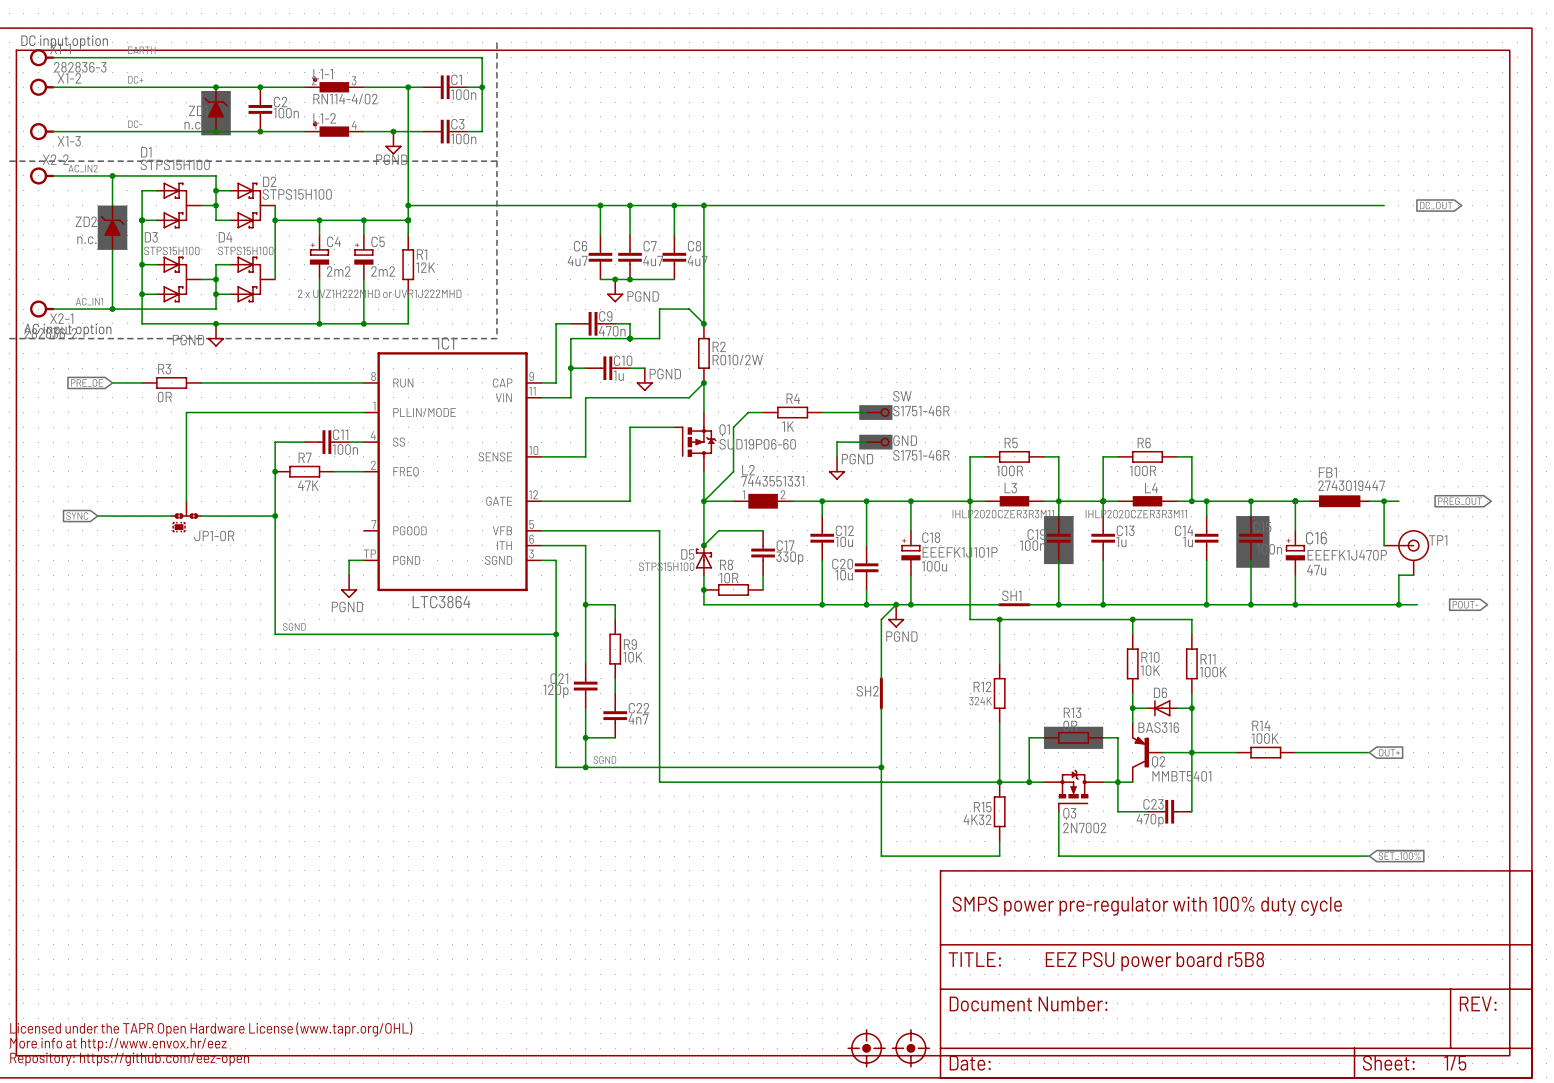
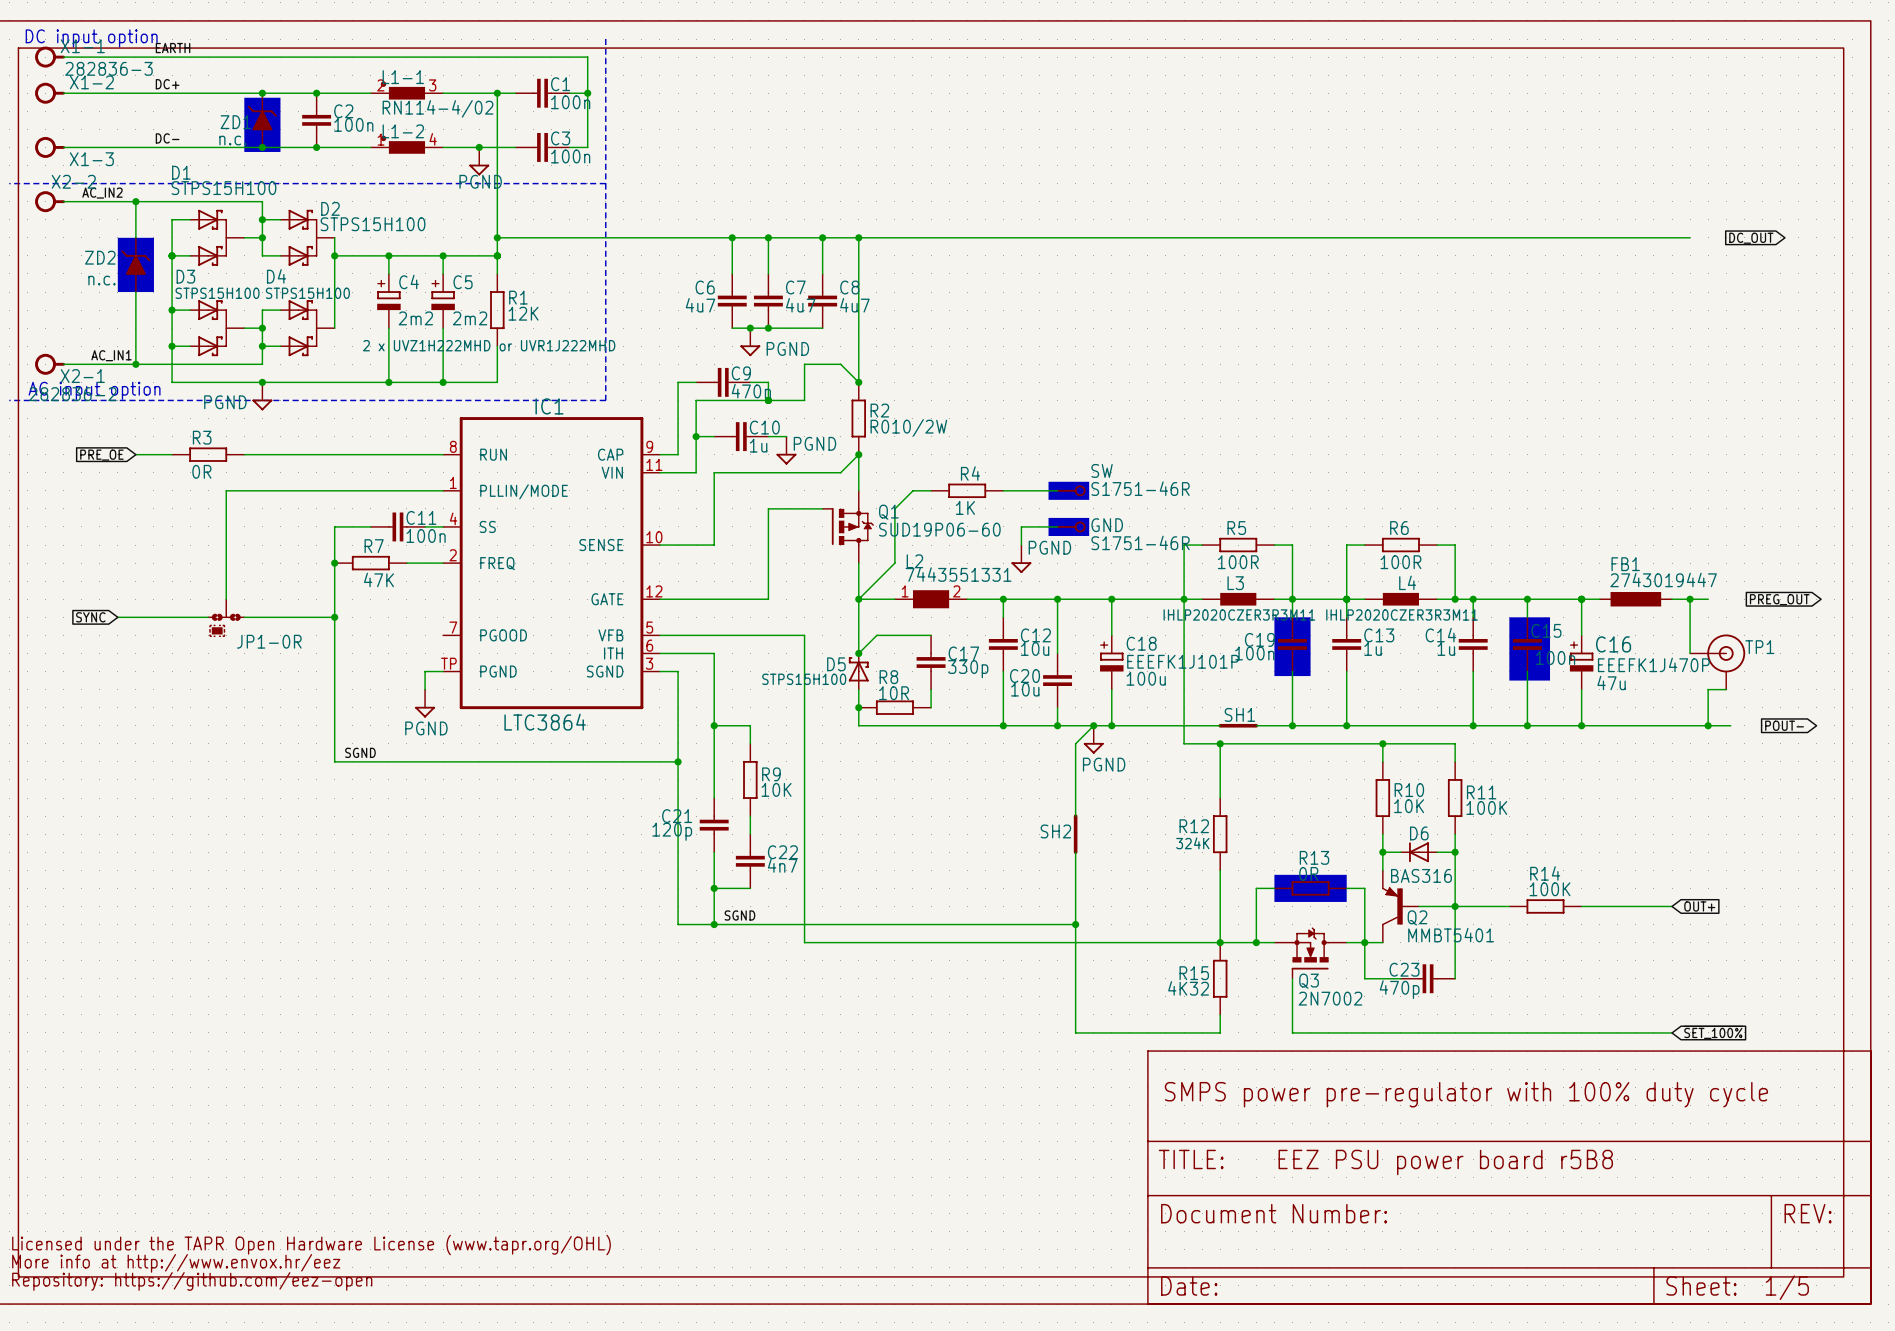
part: (866, 1048) -> none
part: (910, 1048) -> none

